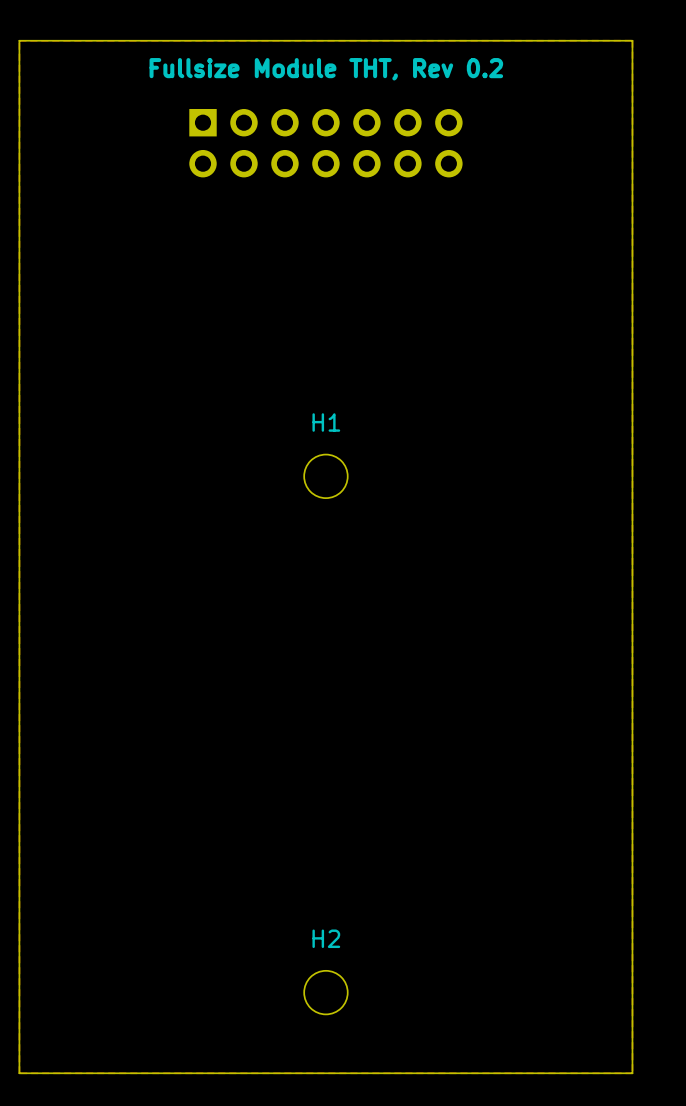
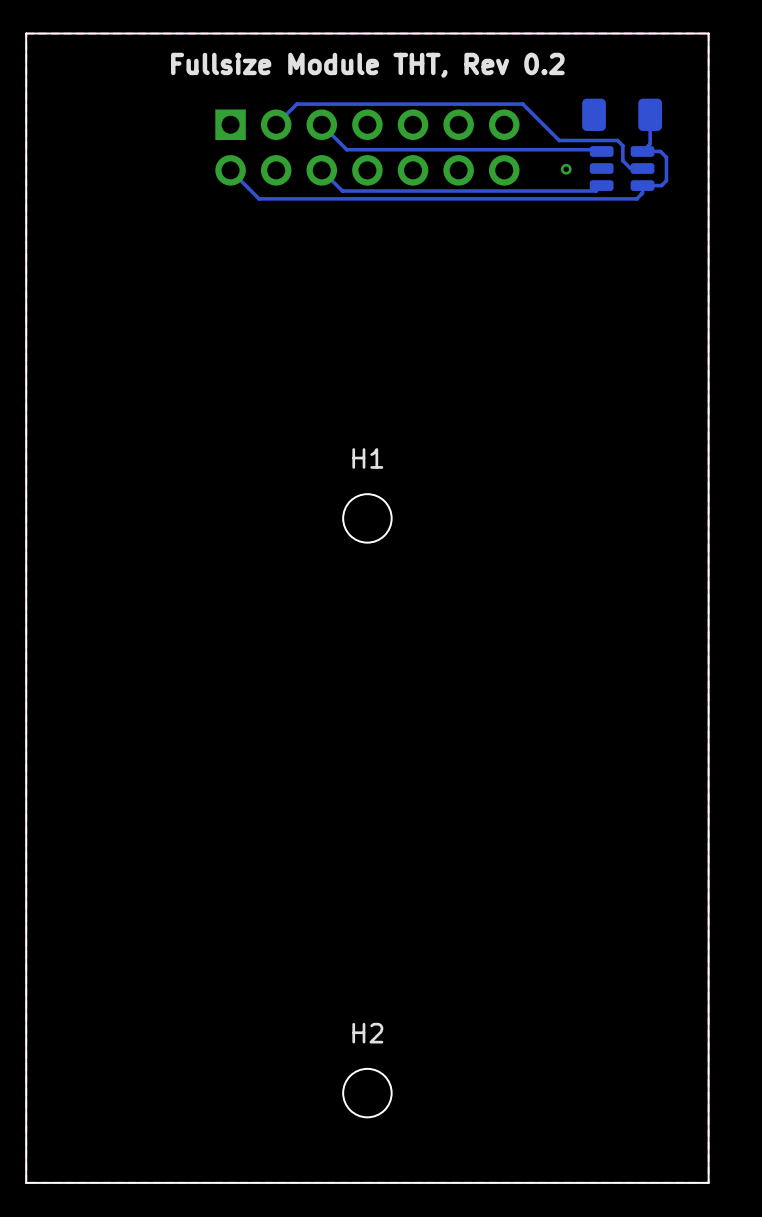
part: none -> (622, 114)
bottom track: none -> (650, 114) (650, 143) (642, 151) (660, 151) (666, 157) (666, 180) (661, 185) (642, 185) (641, 193)
bottom track: none -> (276, 124) (296, 104) (522, 104) (559, 140) (617, 140) (622, 145) (622, 160) (630, 168) (642, 168)
bottom track: none -> (321, 124) (346, 149) (599, 149) (601, 151)
bottom track: none -> (223, 163) (259, 198) (636, 198) (641, 194)
via: none -> (566, 169)
part: none -> (622, 168)
bottom track: none -> (321, 170) (342, 191) (596, 191) (601, 185)

